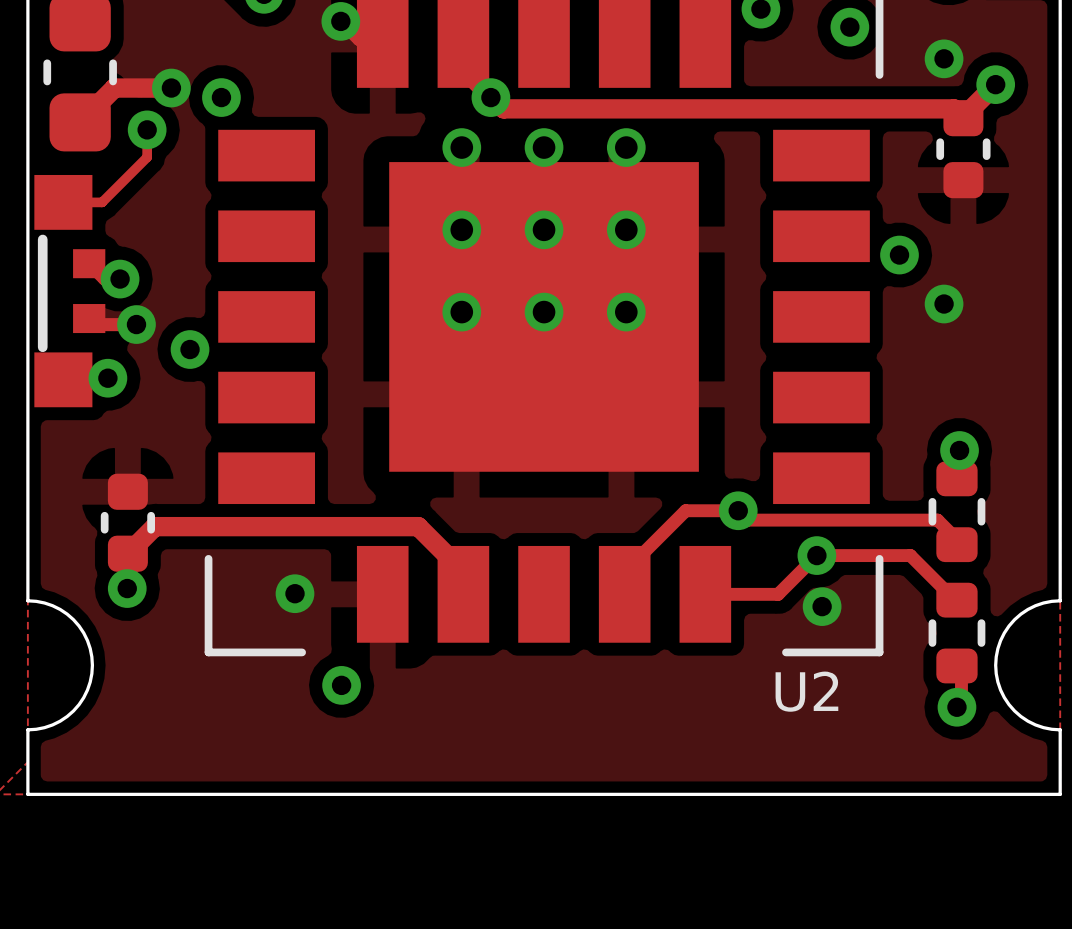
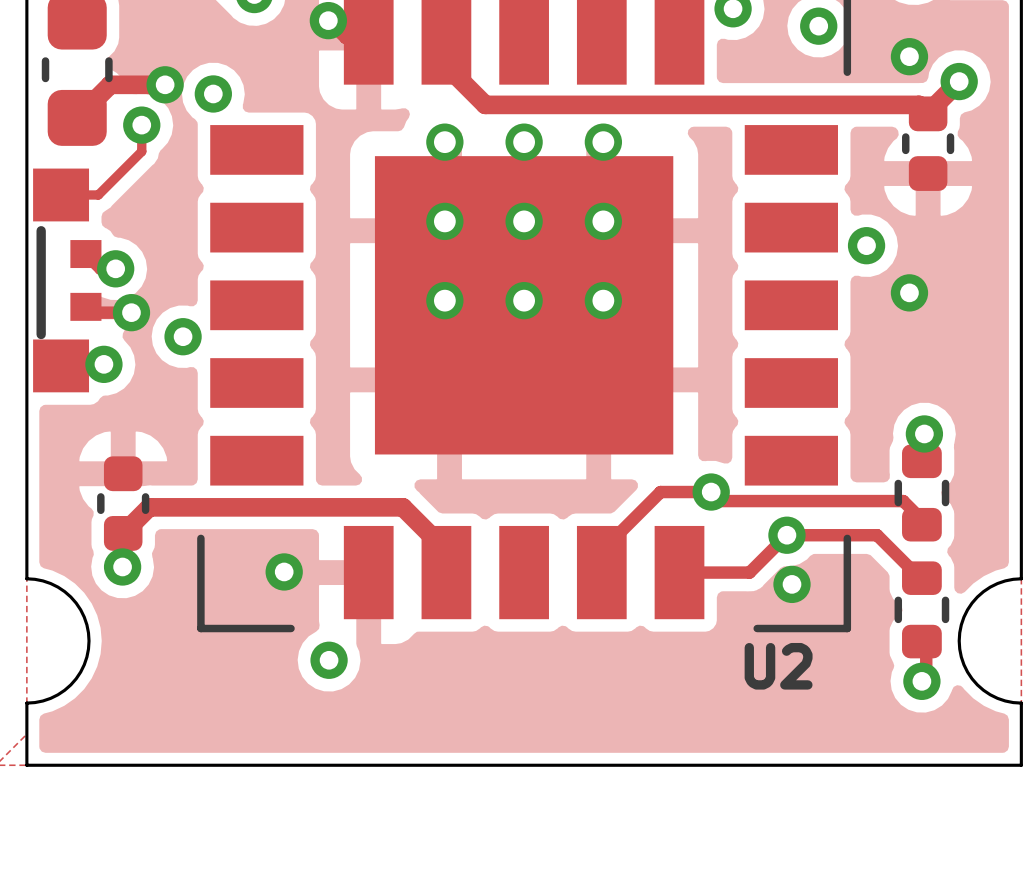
via: (490, 97) -> none

